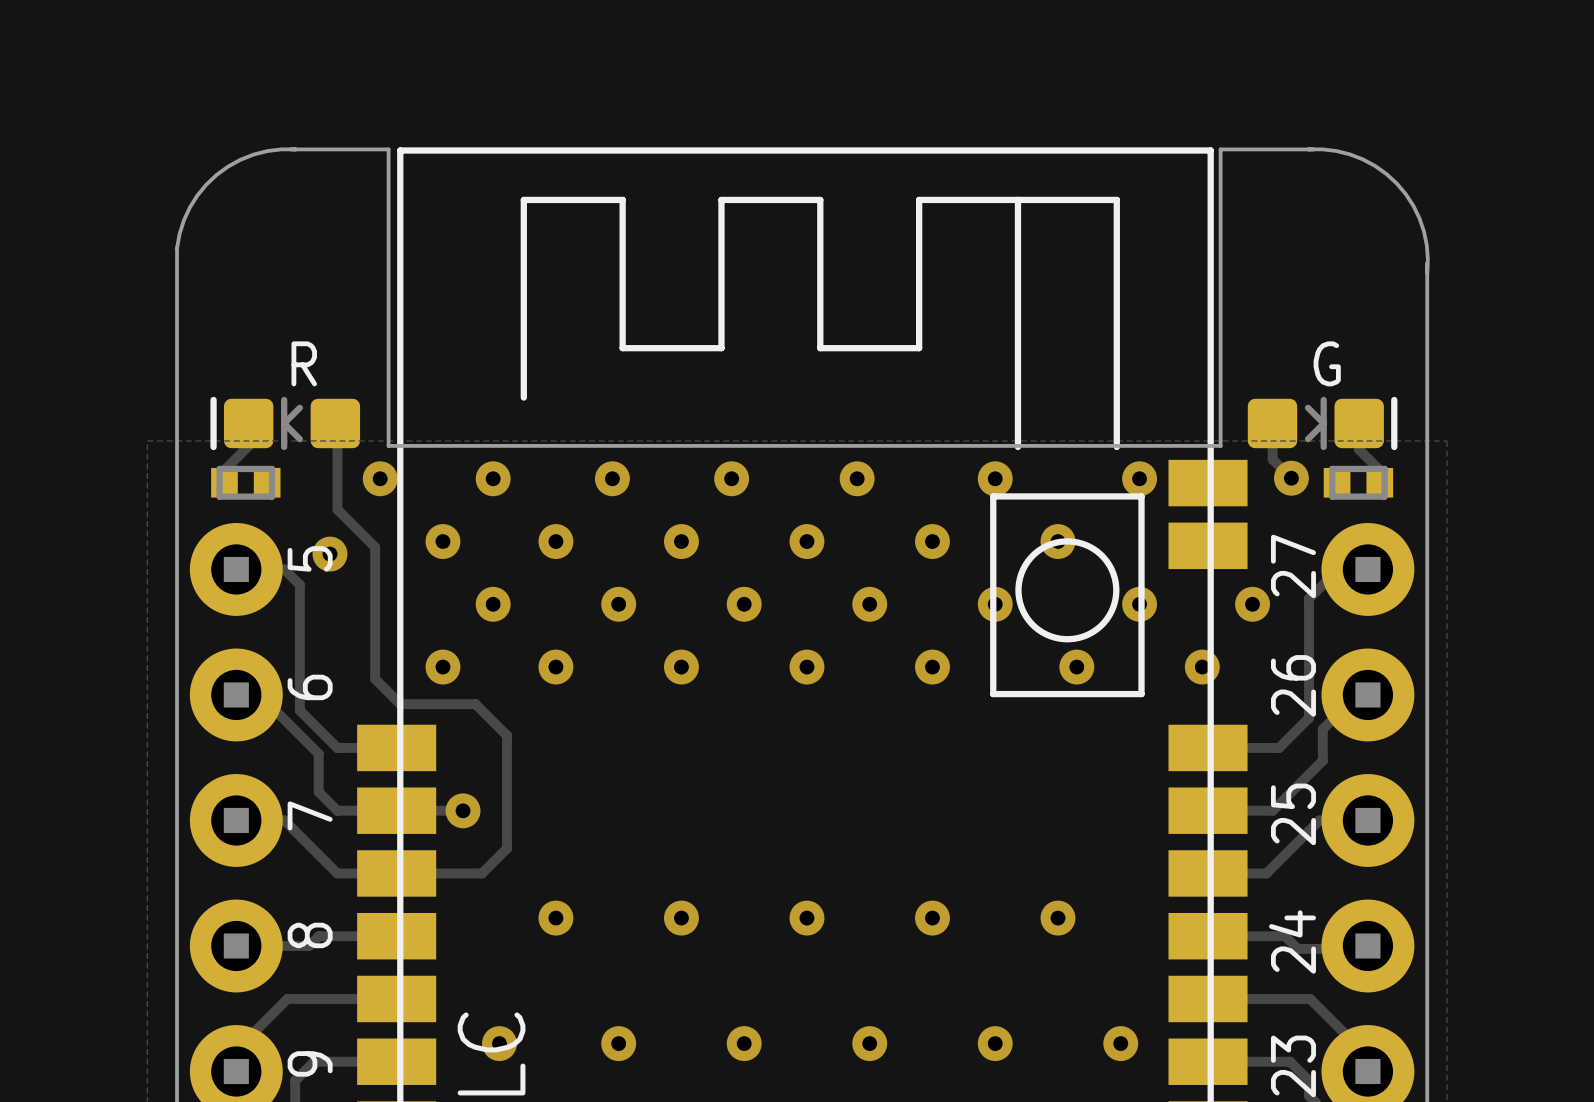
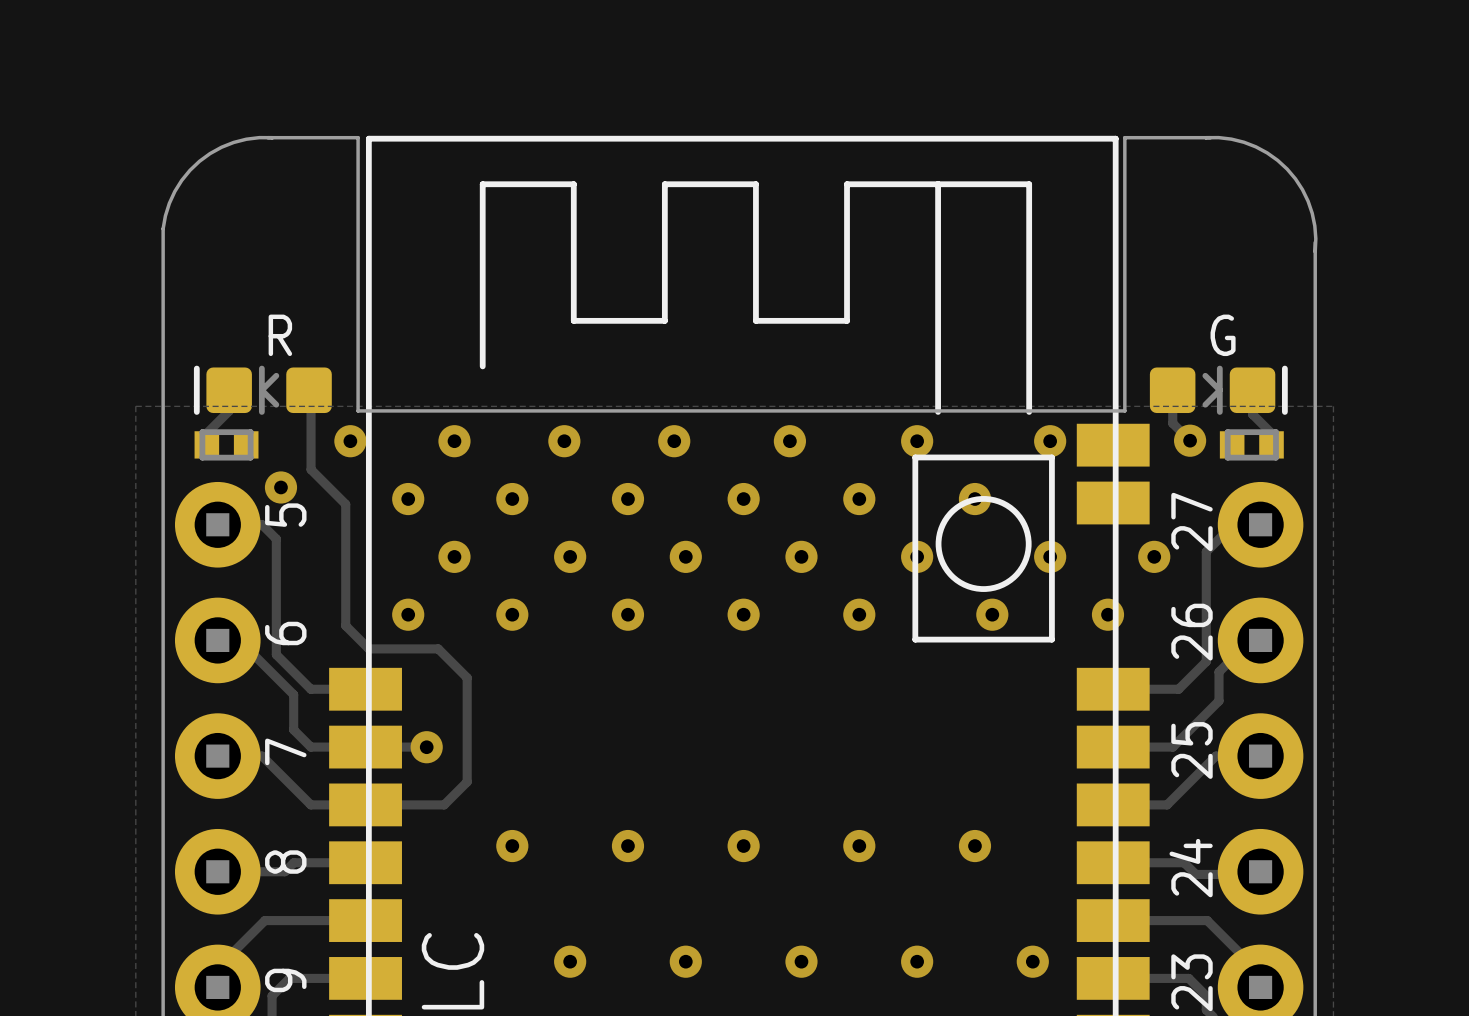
via position: (330, 554) -> (280, 487)
via: (499, 1043) -> none

